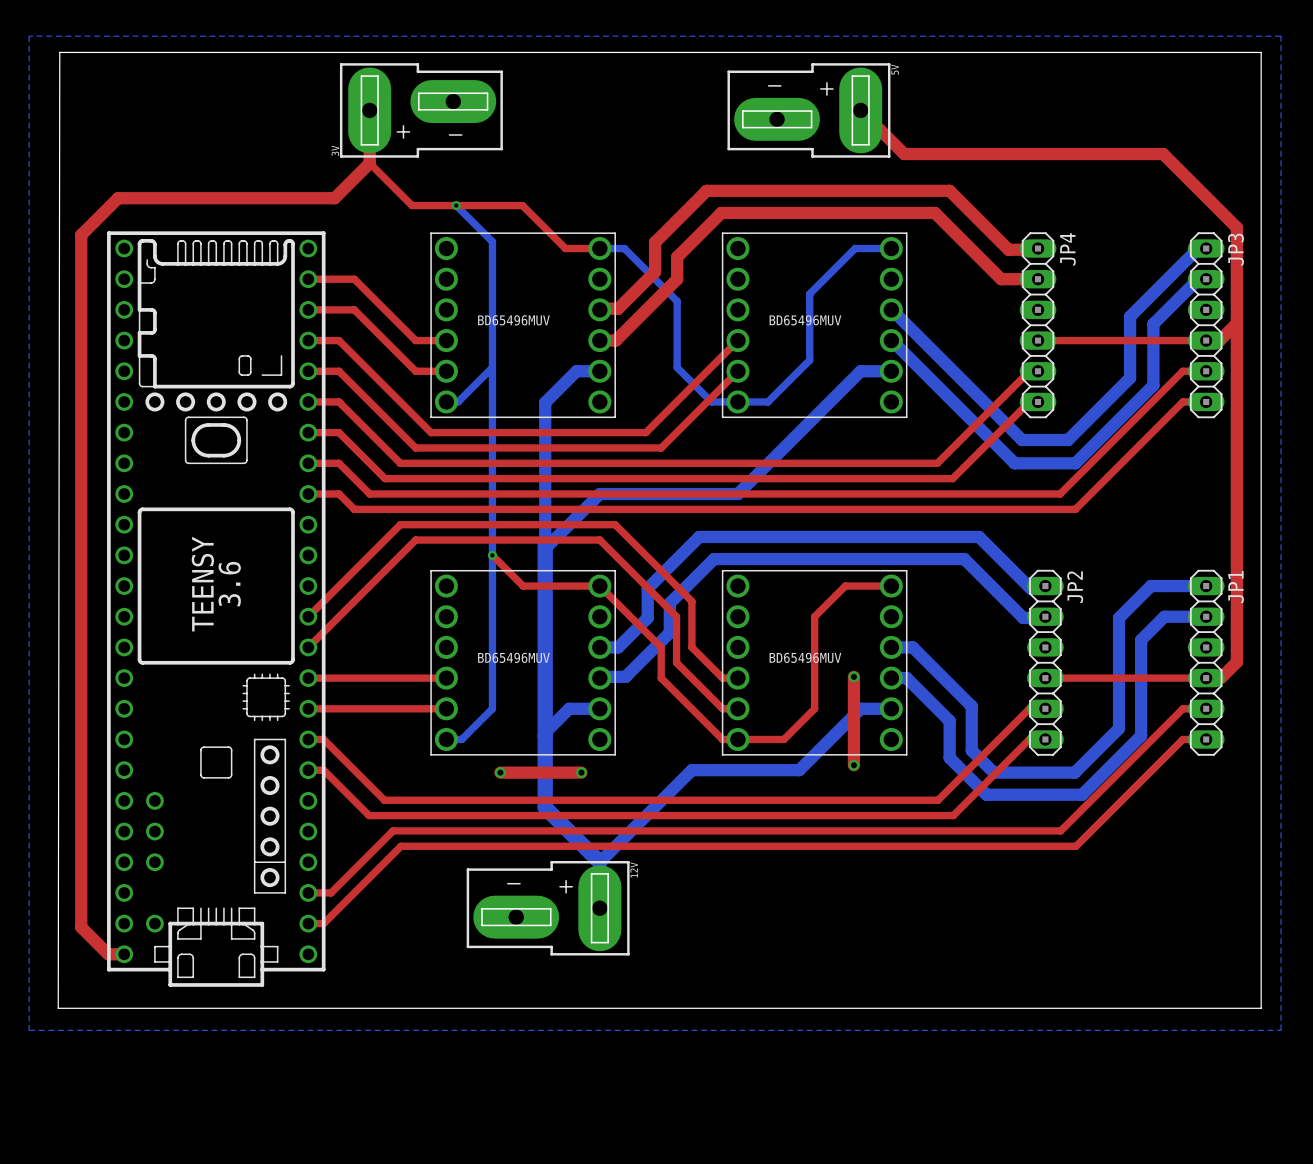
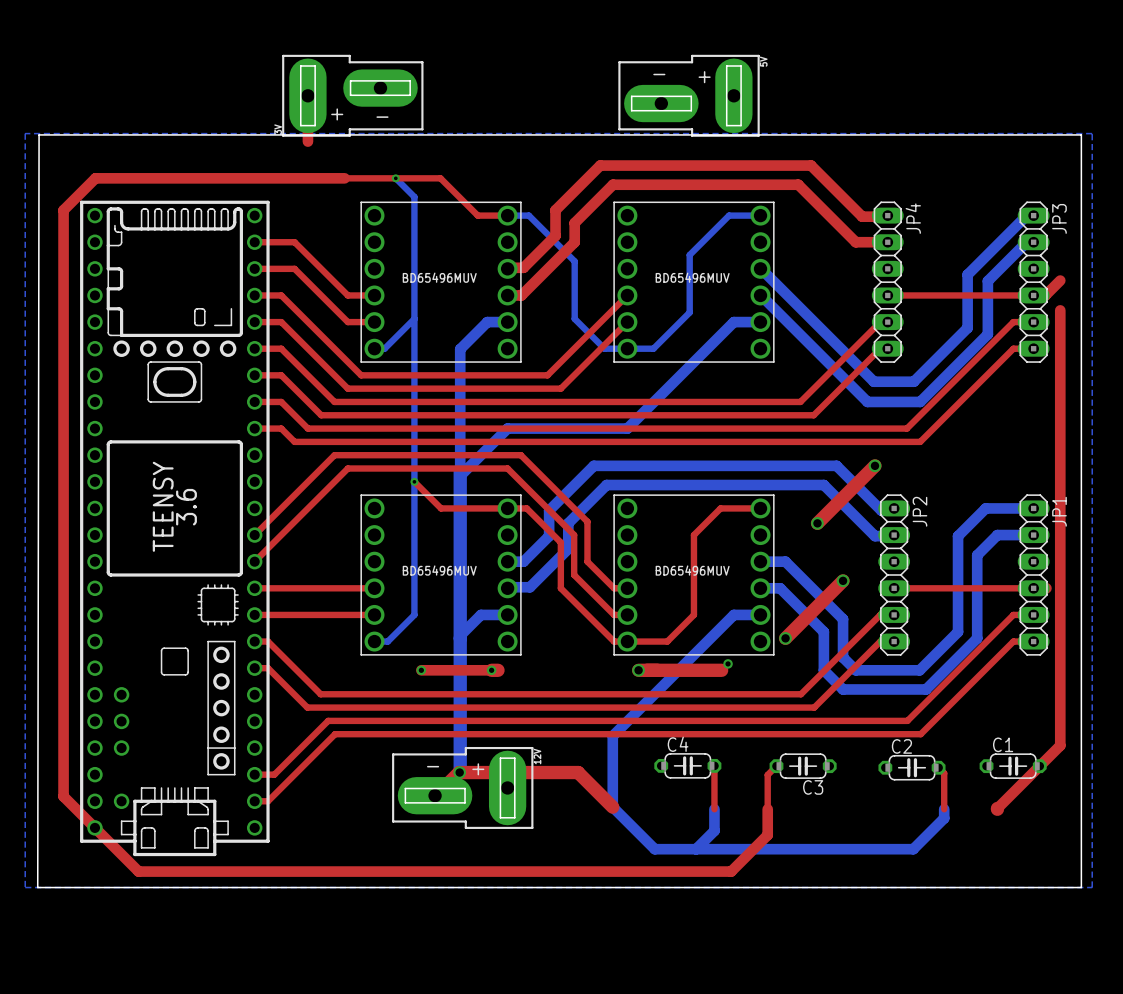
bottom zone outline: (29, 36) (29, 1030) (1281, 1030) (1281, 36) (29, 36) -> (25, 133) (25, 887) (1092, 887) (1092, 133) (25, 133)
top track: (860, 110) (904, 154) (1163, 154) (1236, 227) (1236, 357) -> none
board edge: (1261, 155) (1261, 52) (59, 52) (58, 1008) (1261, 1008) -> (1081, 134) (39, 134) (37, 887) (1081, 887) (1081, 874)
top track: (412, 205) (369, 163) (334, 198) (118, 198) (81, 235) (81, 927) (108, 954) (124, 954) -> (344, 178) (95, 178) (63, 210) (63, 796) (138, 871) (731, 871) (767, 835) (767, 774) (776, 766)
bottom track: (456, 205) (492, 241) -> (395, 178) (414, 196) (414, 209)
via position: (456, 205) -> (395, 178)
top track: none -> (874, 465) (817, 523)
via: none -> (874, 465)
top track: (599, 586) (661, 647) -> (507, 508) (526, 508) (560, 542) (560, 561)
via: none -> (817, 523)
bottom track: (912, 647) (971, 706) (971, 750) (993, 772) (1001, 772) -> (779, 561) (785, 561) (843, 619) (843, 657) (855, 670)
top track: (1236, 662) (1222, 676) -> (1060, 574) (1060, 745) (997, 809)
top track: none -> (843, 580) (785, 638)
via: none -> (843, 580)
top track: (853, 676) (853, 765) -> none
via: (853, 676) -> none
bottom track: (906, 678) (949, 721) (949, 757) (964, 772) -> (773, 588) (780, 588) (823, 631) (823, 670)
via: none -> (785, 638)
bottom track: (799, 770) (691, 770) (599, 862) -> (680, 668) (612, 736) (612, 807) (654, 849) (913, 849) (944, 818) (944, 809)
top track: none -> (491, 670) (498, 670)
top track: none -> (638, 670) (721, 670)
via: none -> (638, 670)
bottom track: (545, 807) (599, 862) -> (460, 700) (460, 771)
C4: none -> (687, 765)
top track: none -> (714, 765) (714, 809)
C3: none -> (803, 766)
C1: none -> (1013, 766)
C2: none -> (911, 767)
top track: none -> (938, 767) (944, 773) (944, 809)
via: none -> (459, 772)
top track: none -> (424, 807) (459, 772) (578, 772) (612, 807)
bottom track: none -> (714, 809) (714, 830) (696, 849)

